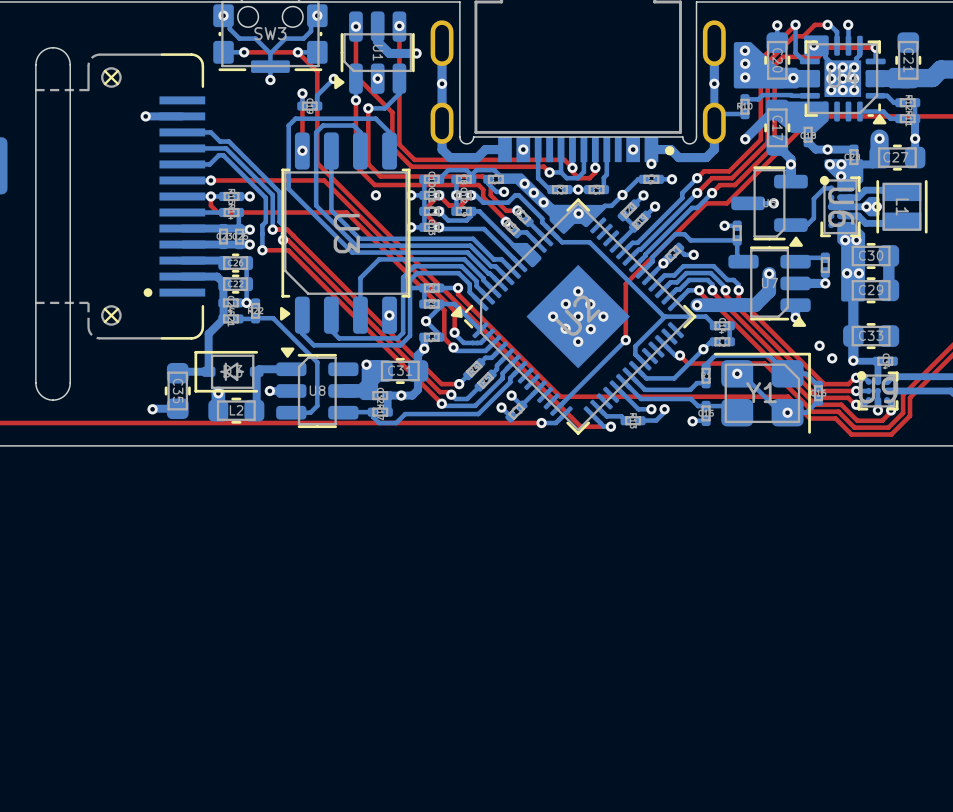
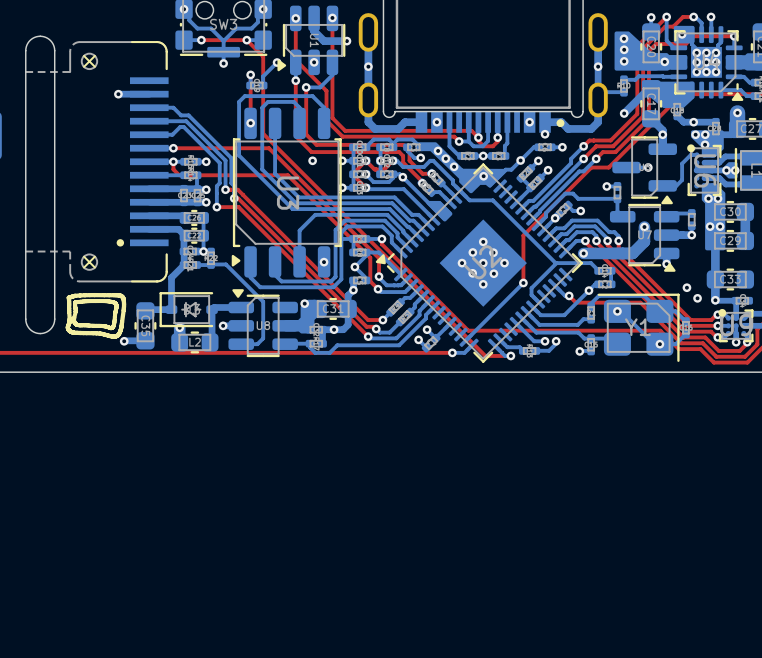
via: none -> (402, 177)
line: none -> (119, 295) (84, 295) (68, 297) (69, 320) (68, 326)
line: none -> (123, 298) (121, 326) (117, 335) (72, 332)
line: none -> (76, 302) (113, 302)
line: none -> (75, 303) (75, 311)
line: none -> (116, 305) (113, 326)
line: none -> (75, 311) (74, 320)
line: none -> (77, 324) (109, 327)

